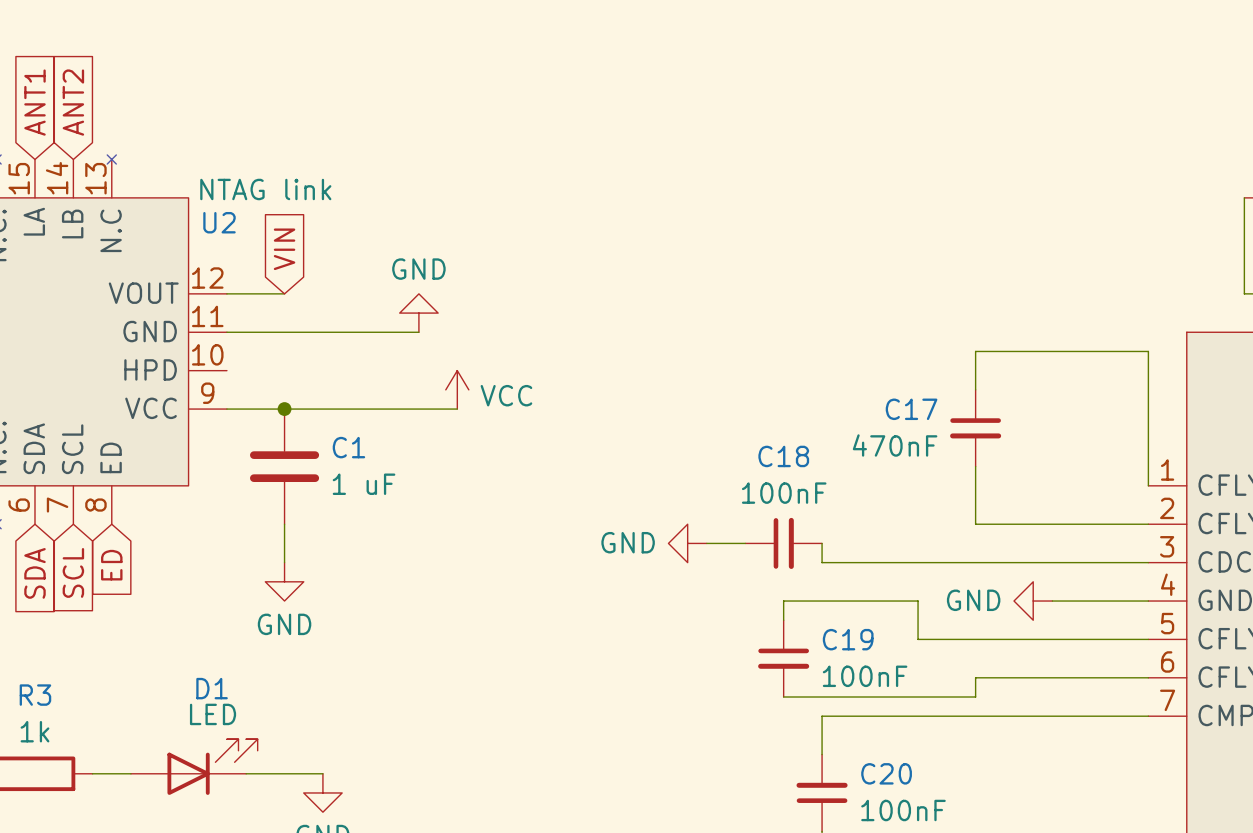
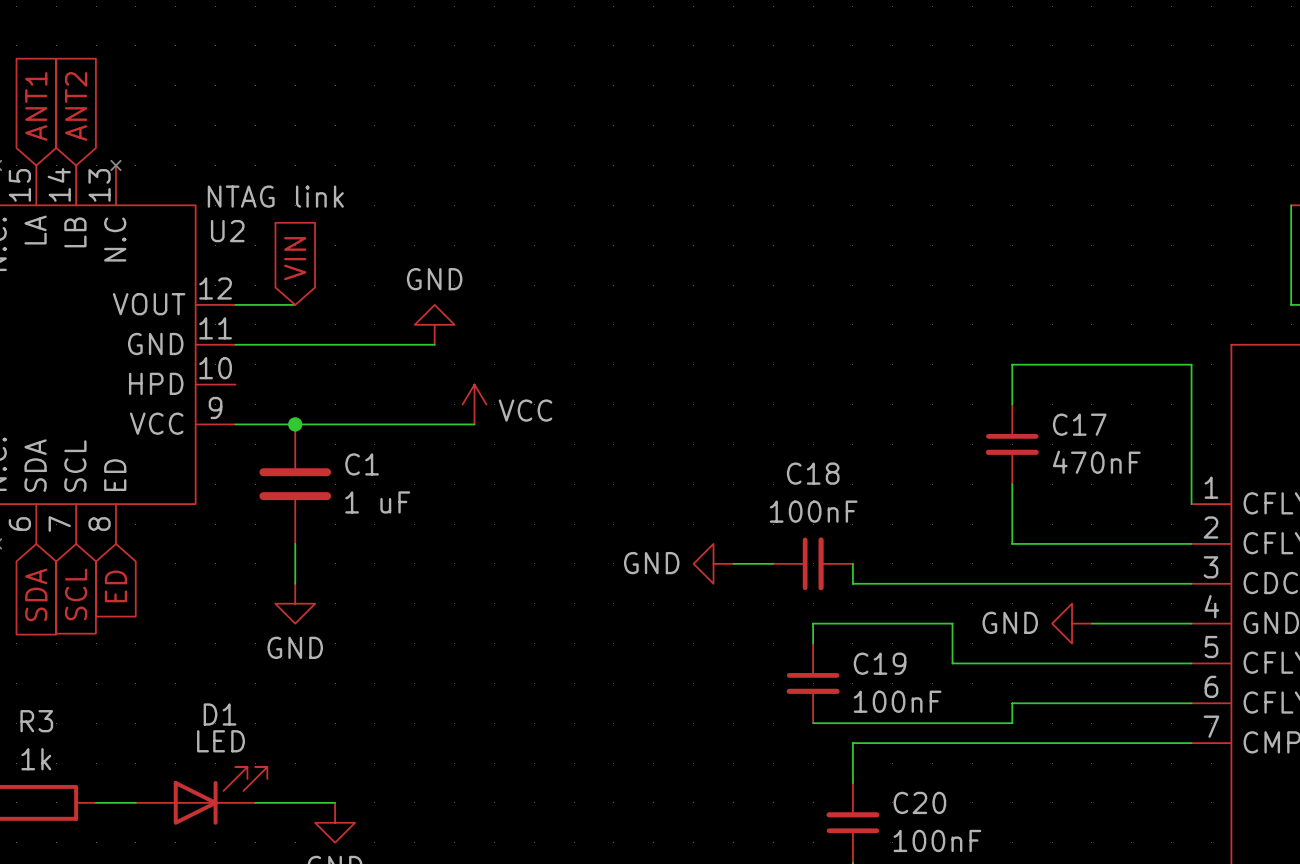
C17 name position: C17 (911, 409) -> C17 (1079, 424)
C17 value position: 470nF (895, 445) -> 470nF (1096, 462)

